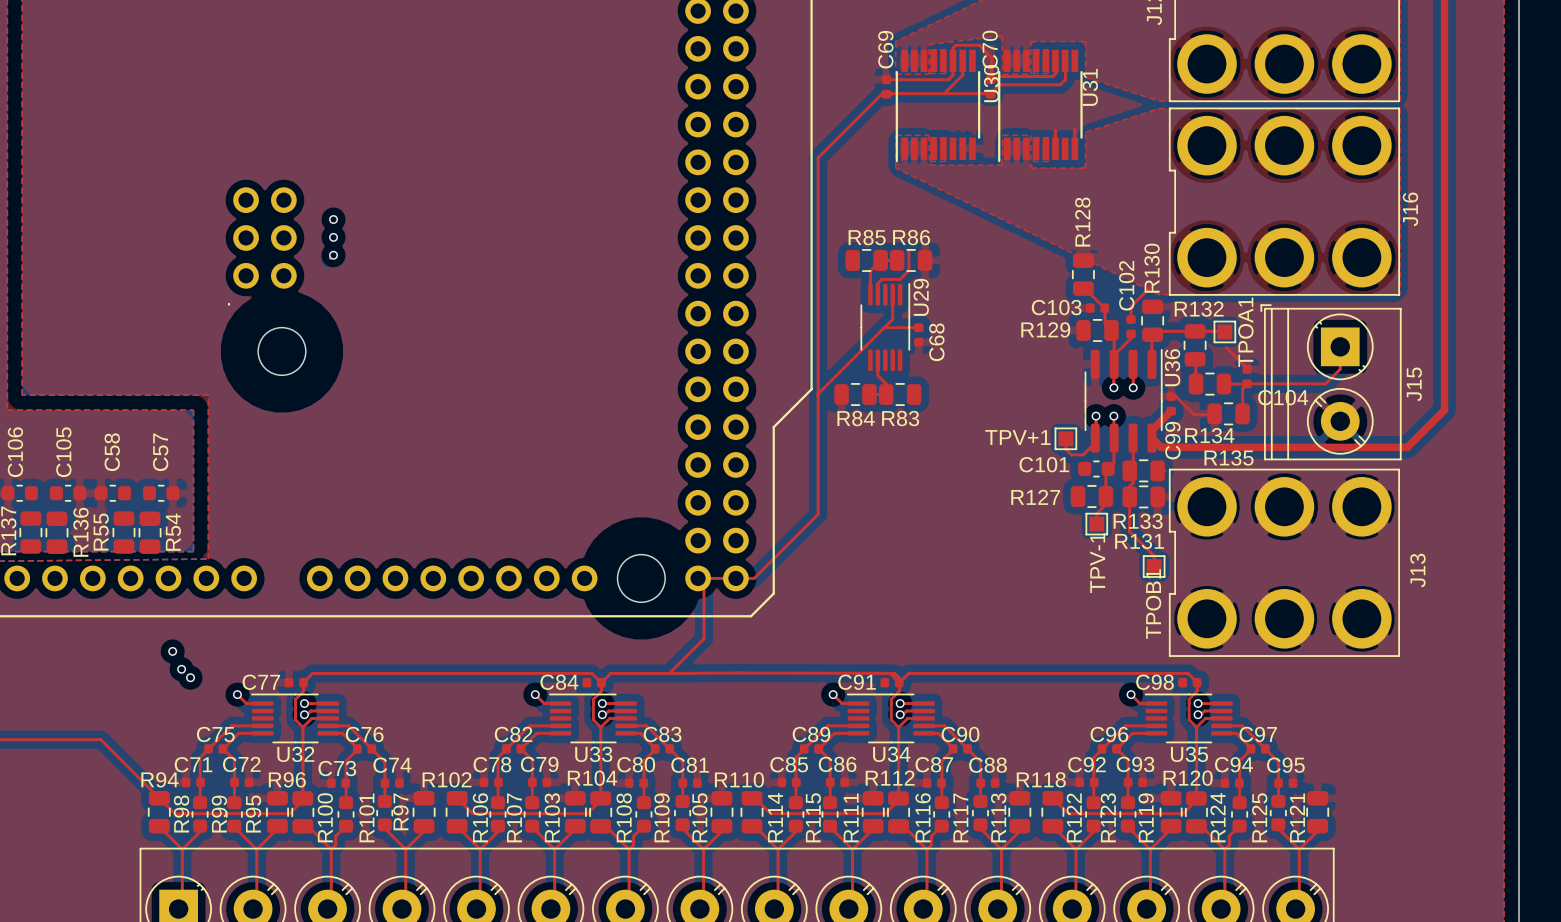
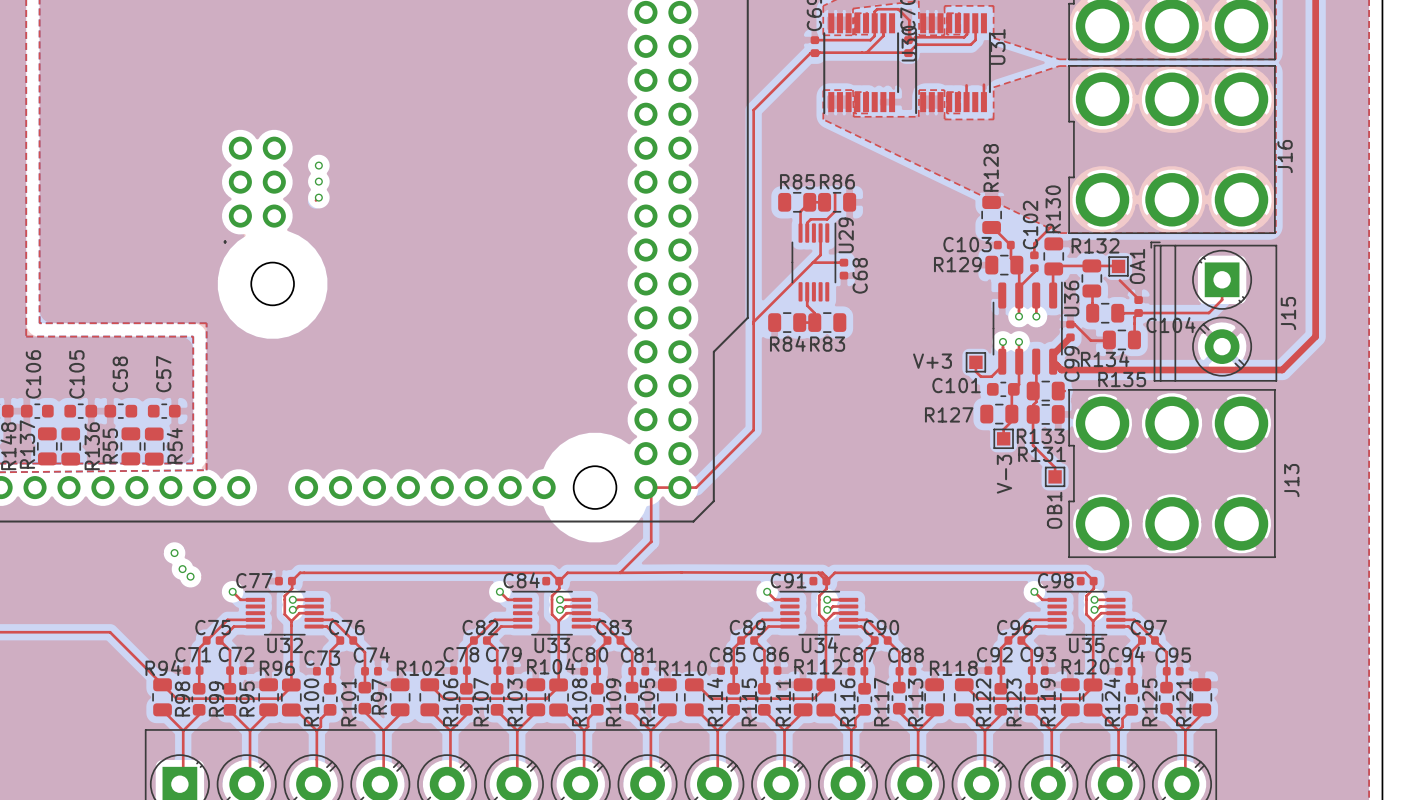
TPOA1 name: TPOA1 (1245, 332) -> OA1 (1137, 266)
TPV+1 name: TPV+1 (1017, 437) -> V+3 (932, 361)
TPV-1 name: TPV-1 (1097, 563) -> V-3 (1004, 474)
TPOB1 name: TPOB1 (1153, 604) -> OB1 (1054, 510)

